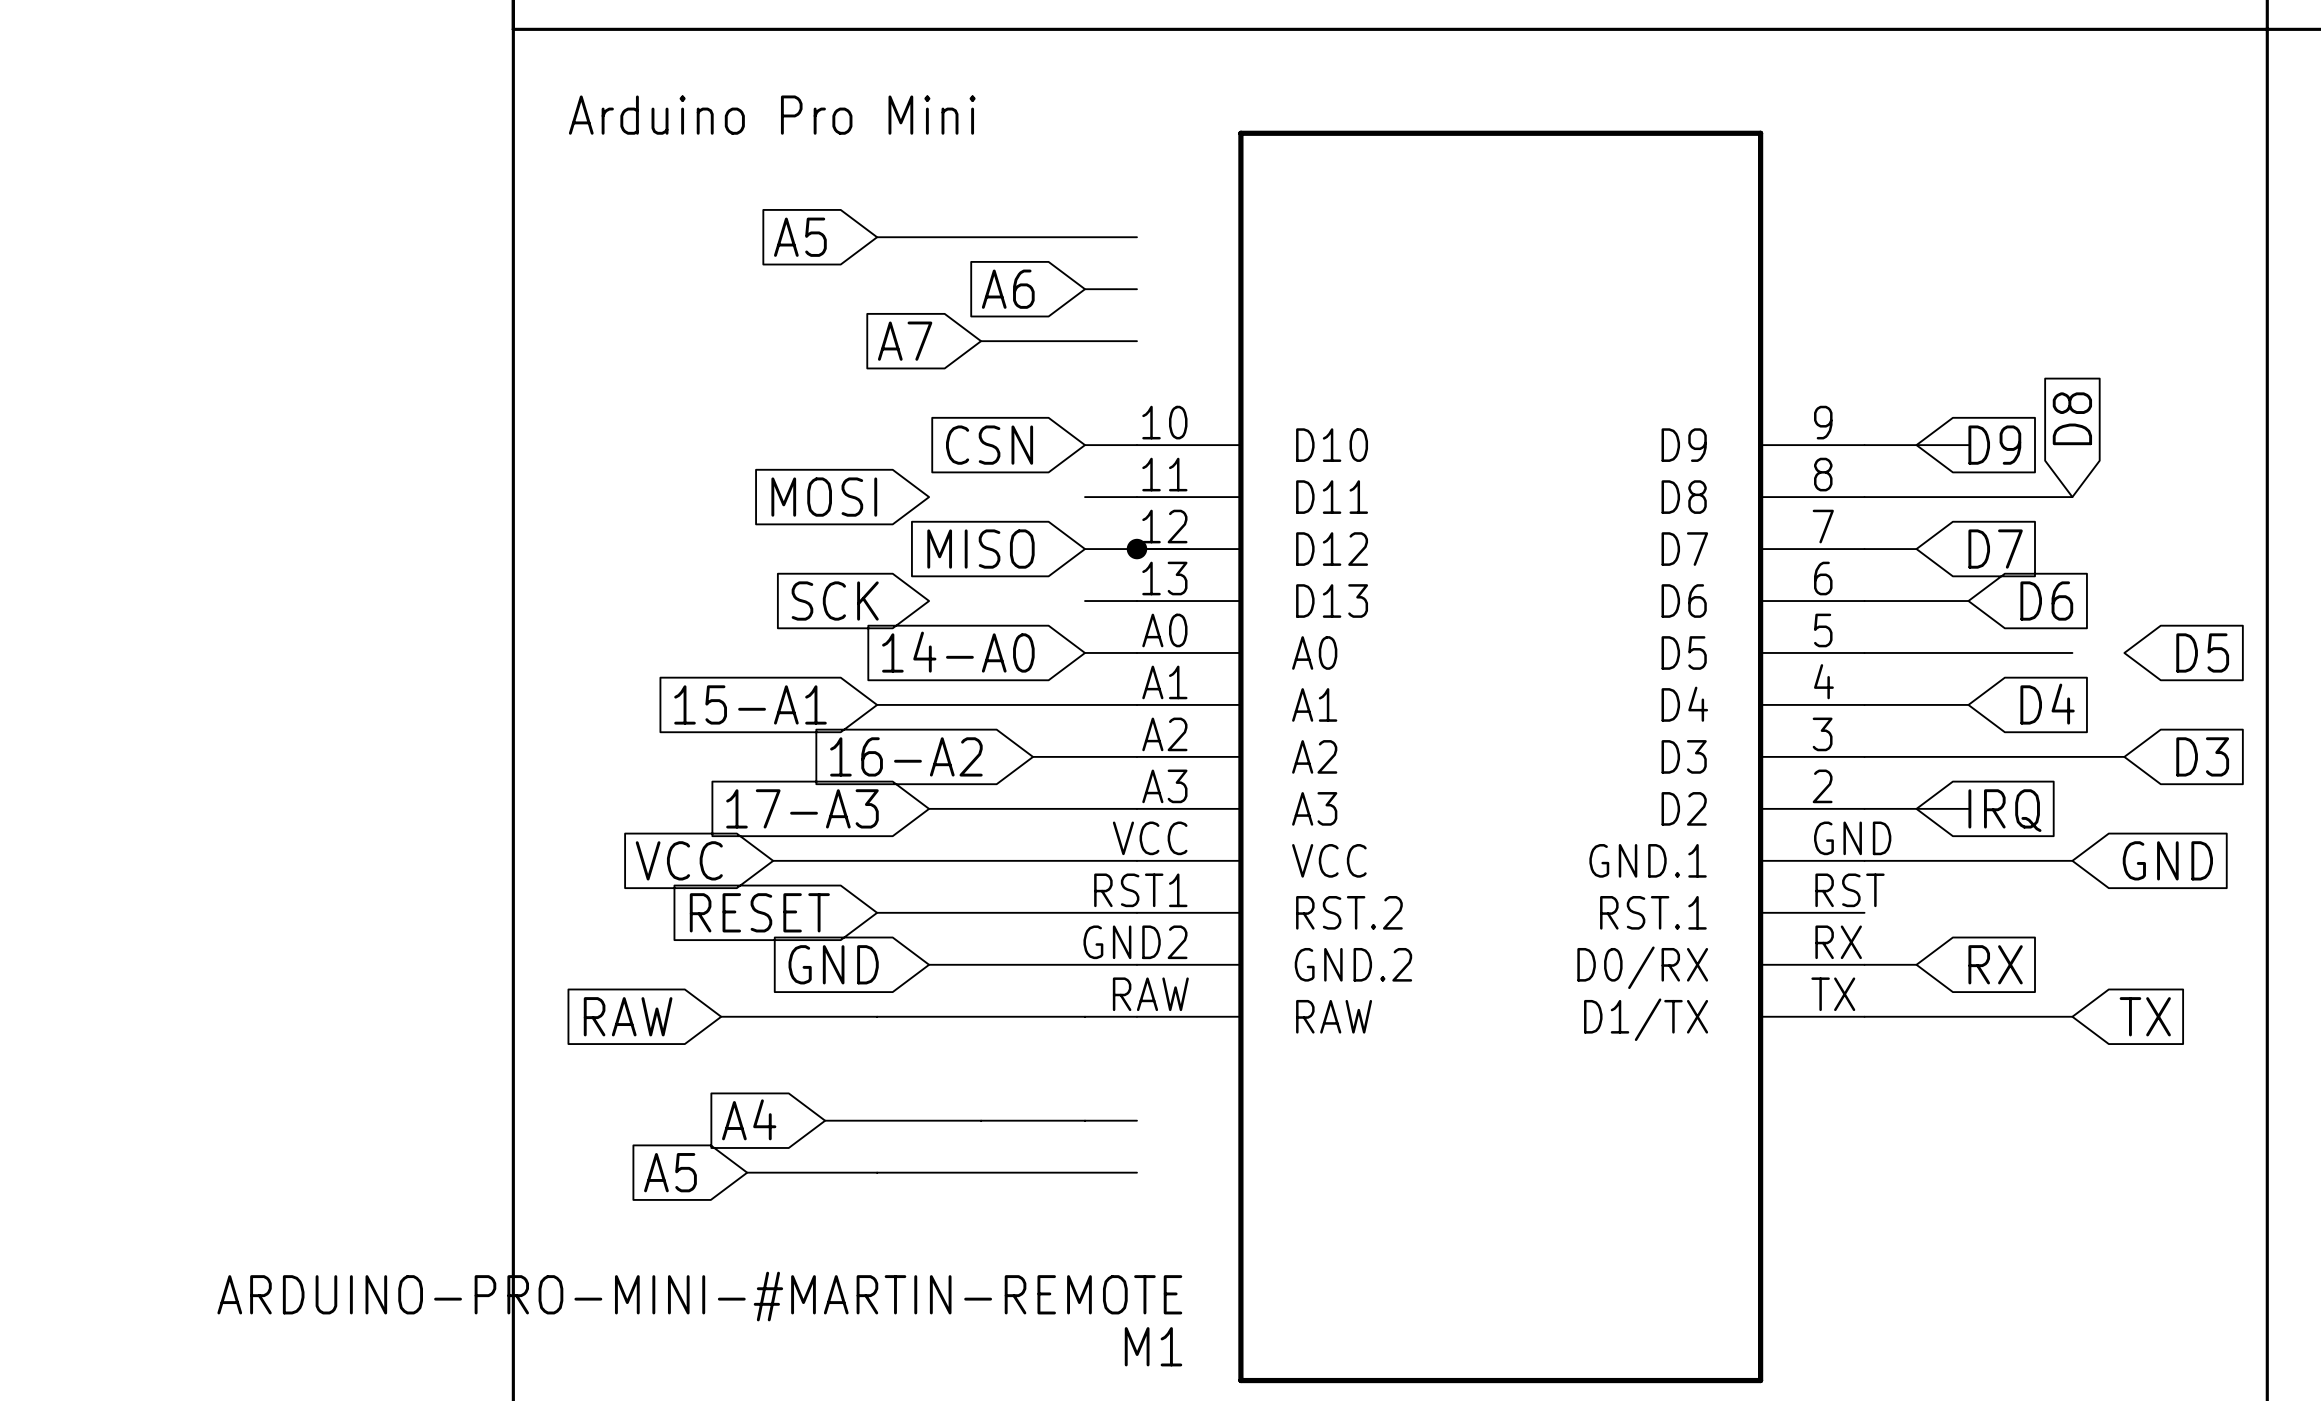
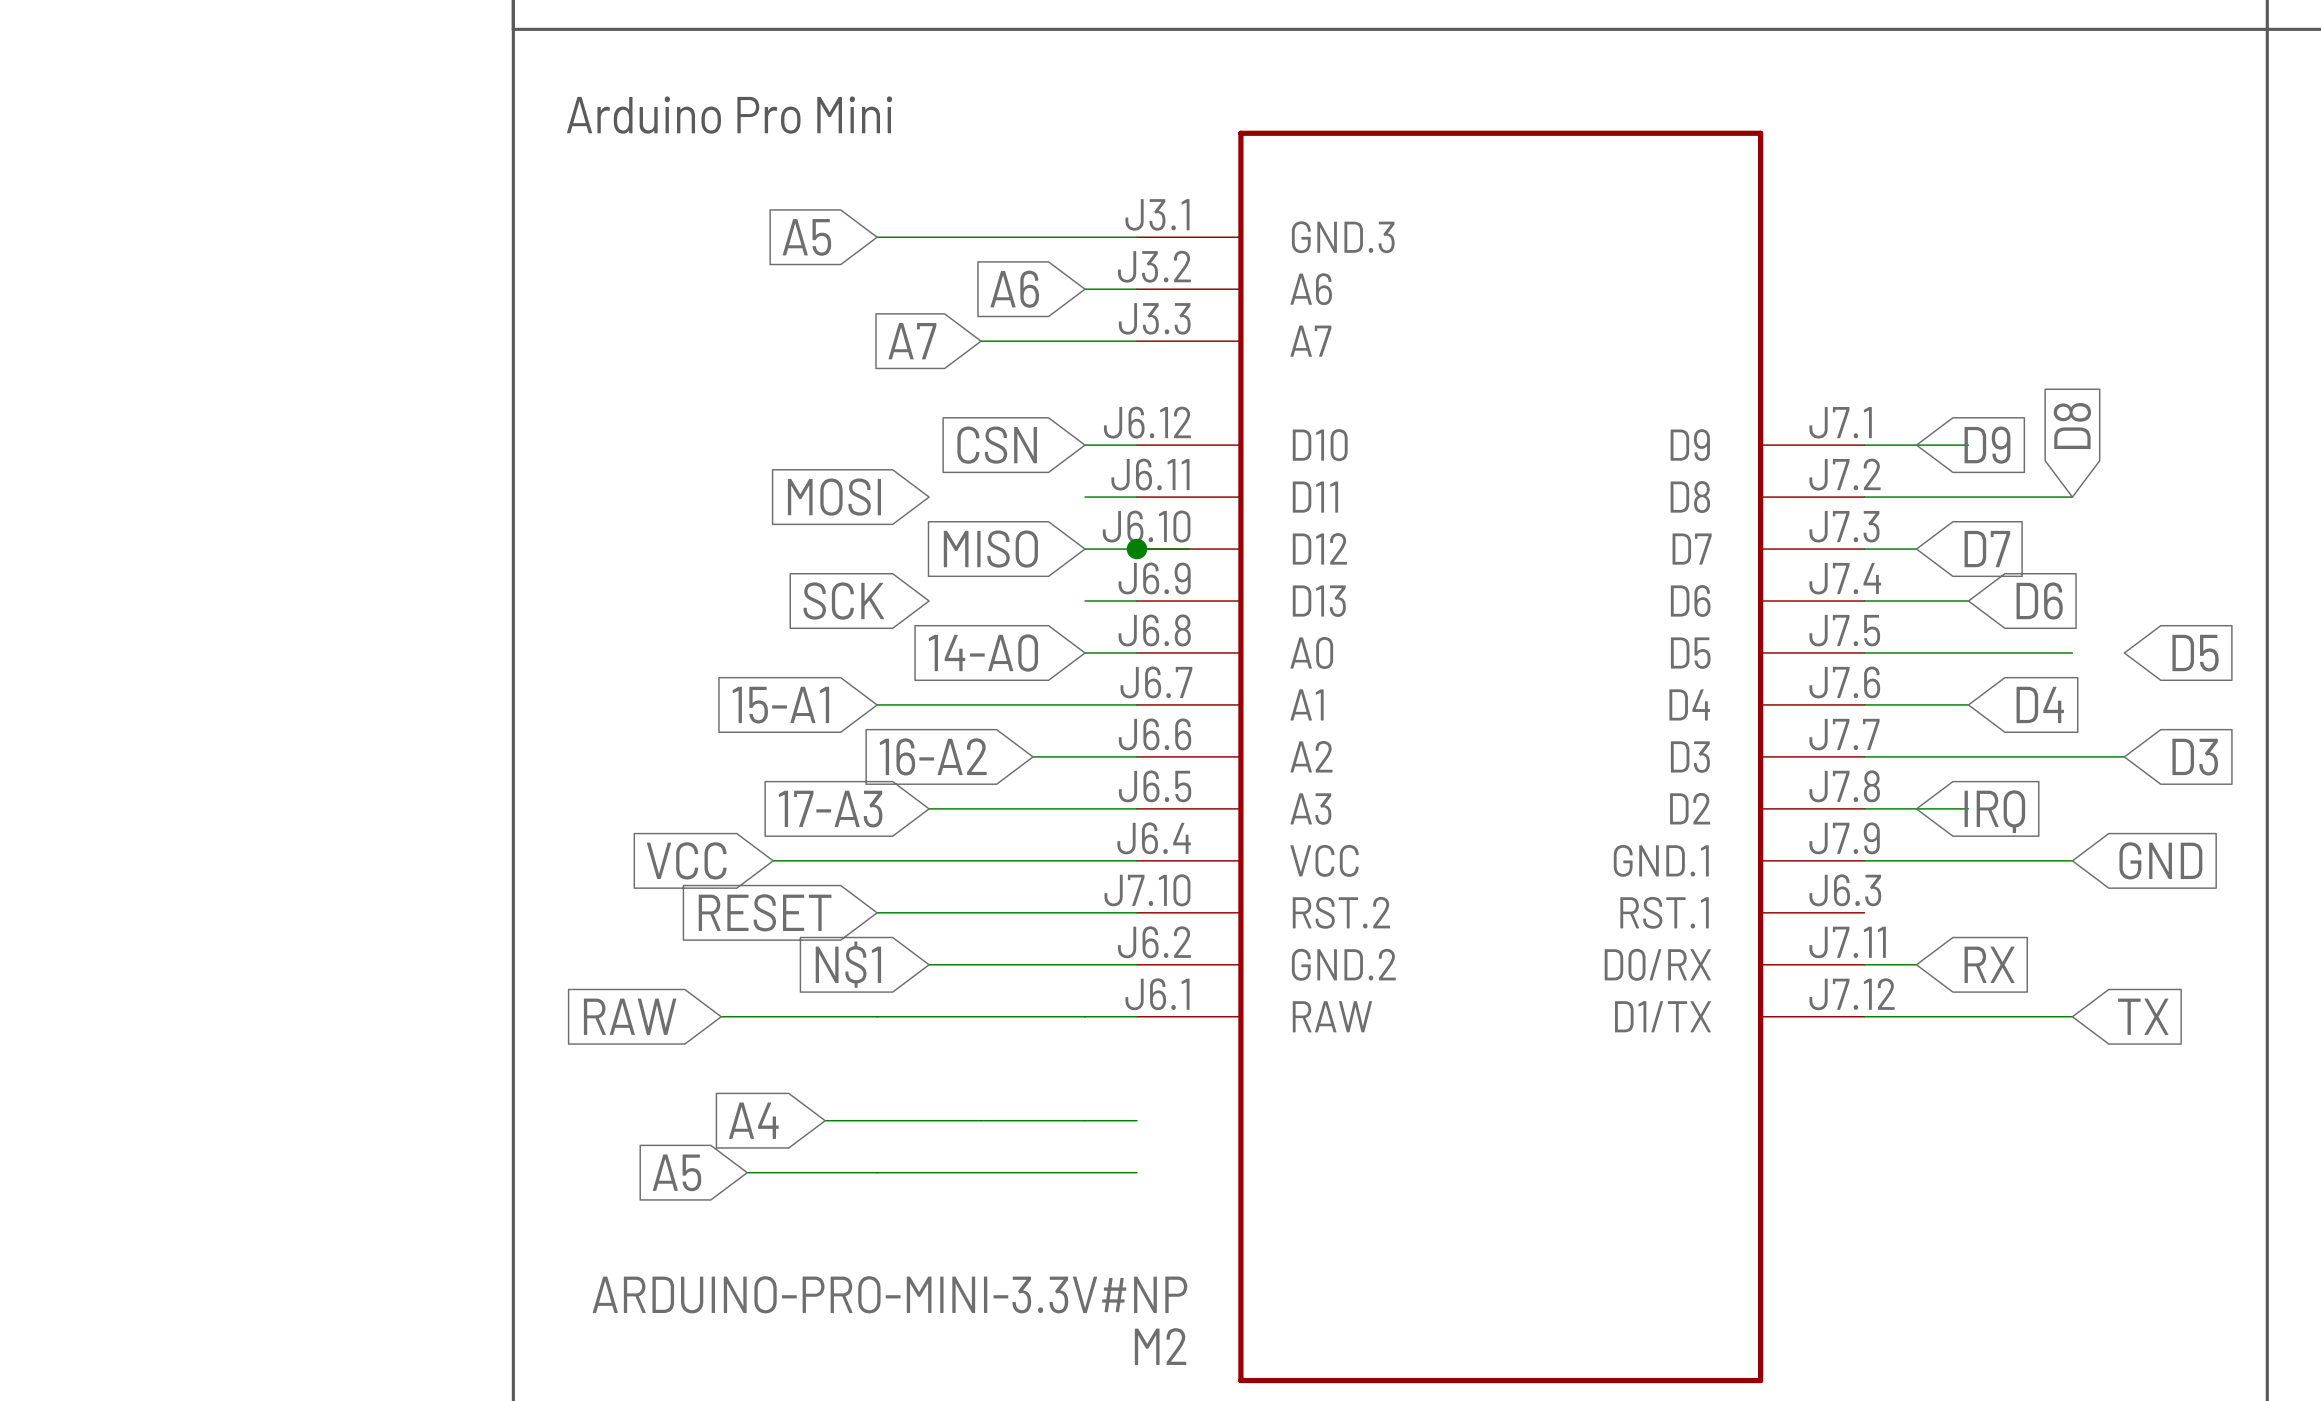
M1: ARDUINO-PRO-MINI-#MARTIN-REMOTE (1500, 756) -> none
M2: none -> ARDUINO-PRO-MINI-3.3V#NP (1500, 756)
global label: GND (833, 964) -> N$1 (848, 964)

